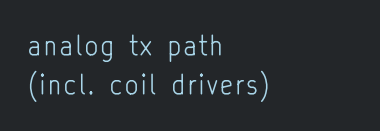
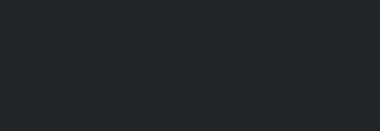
text: analog tx path (124, 48) -> none
text: (incl. coil drivers) (148, 86) -> none

